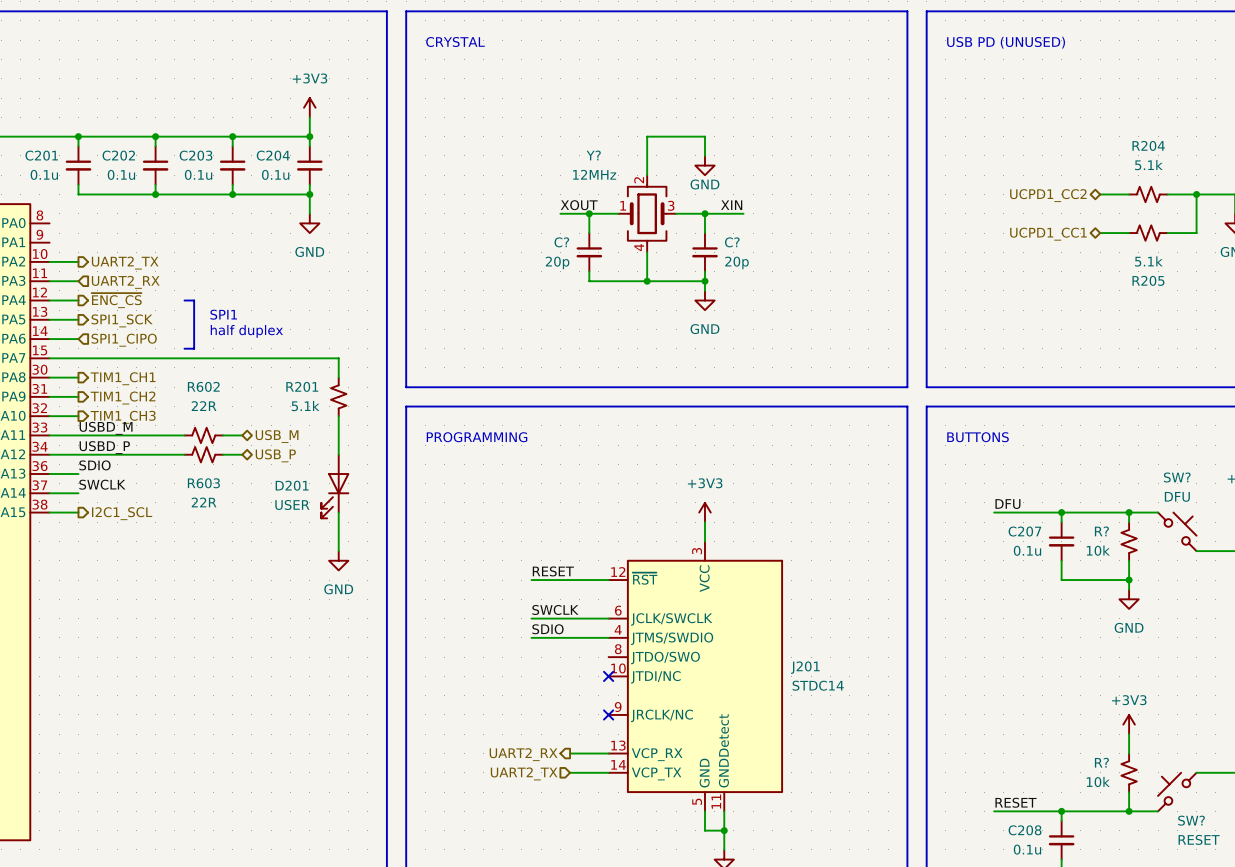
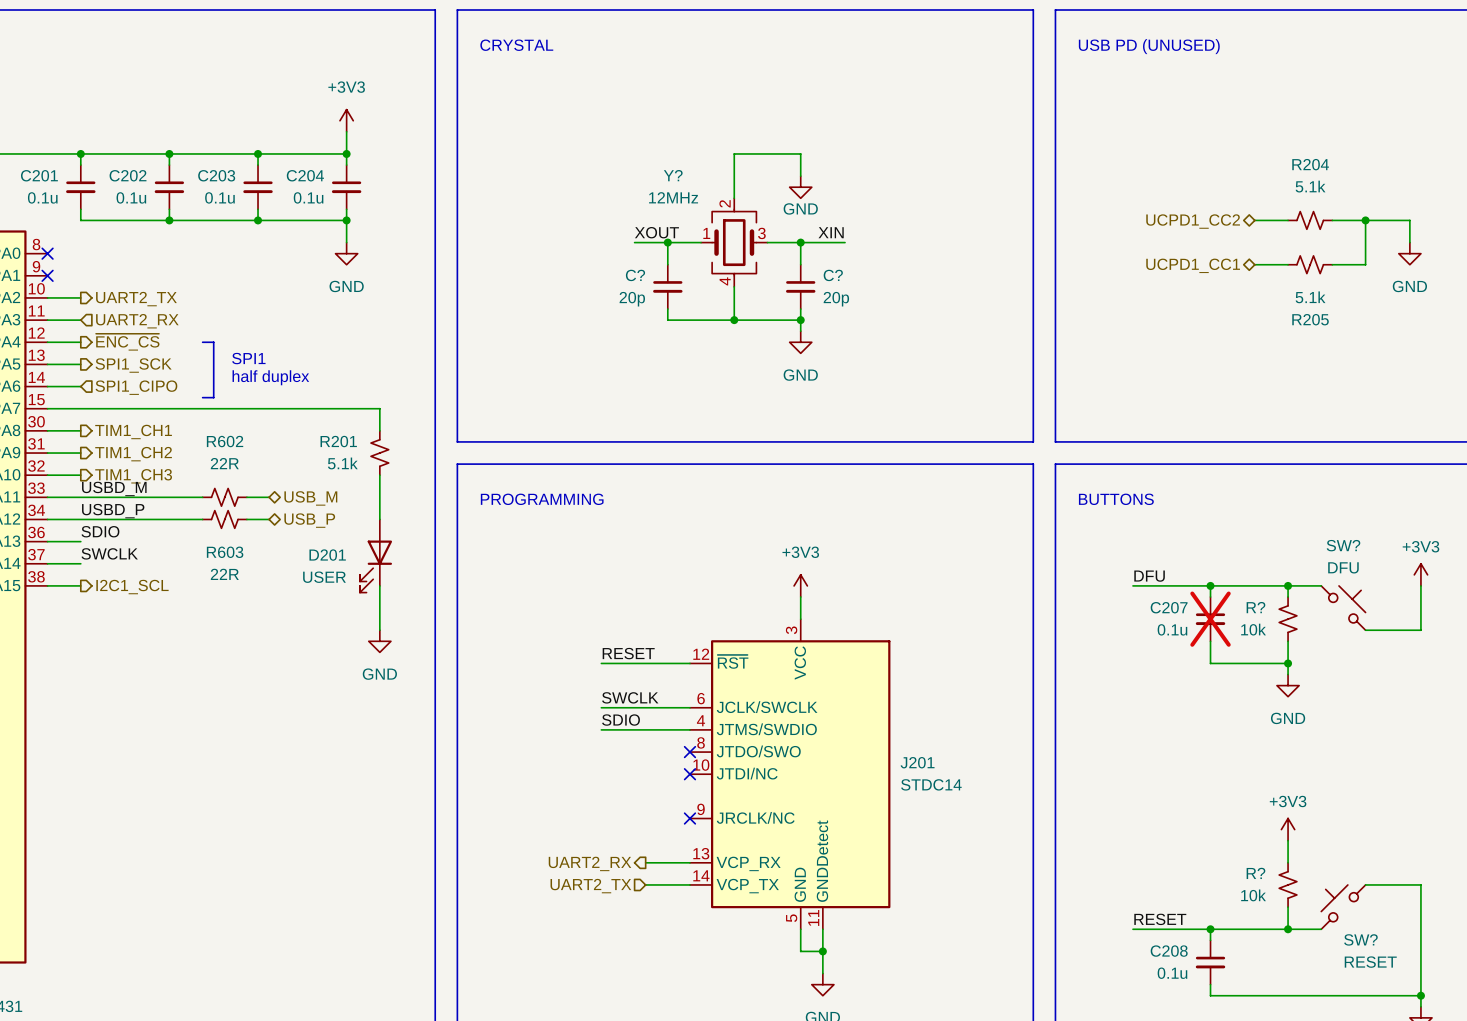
no-connect mark: none -> (47, 253)
no-connect mark: none -> (47, 275)
C207 do-not-place cross: none -> (1210, 619)
no-connect mark: none -> (689, 752)

